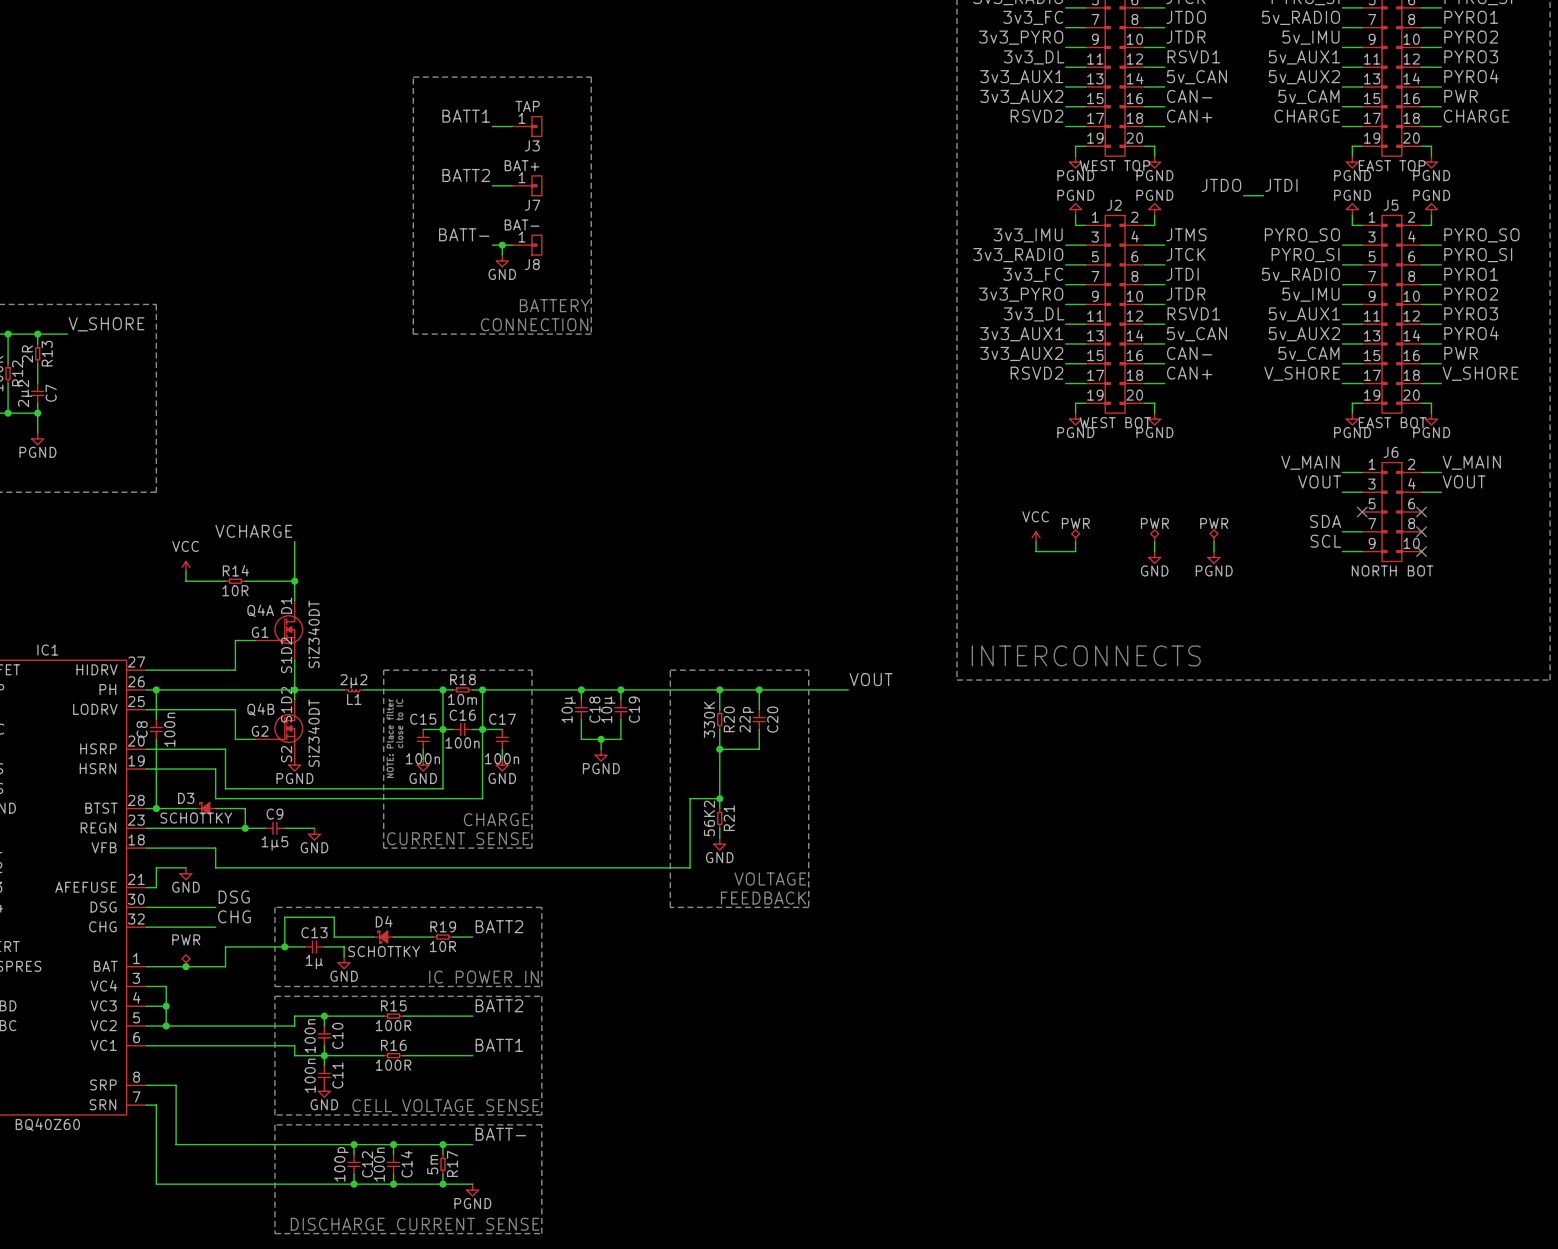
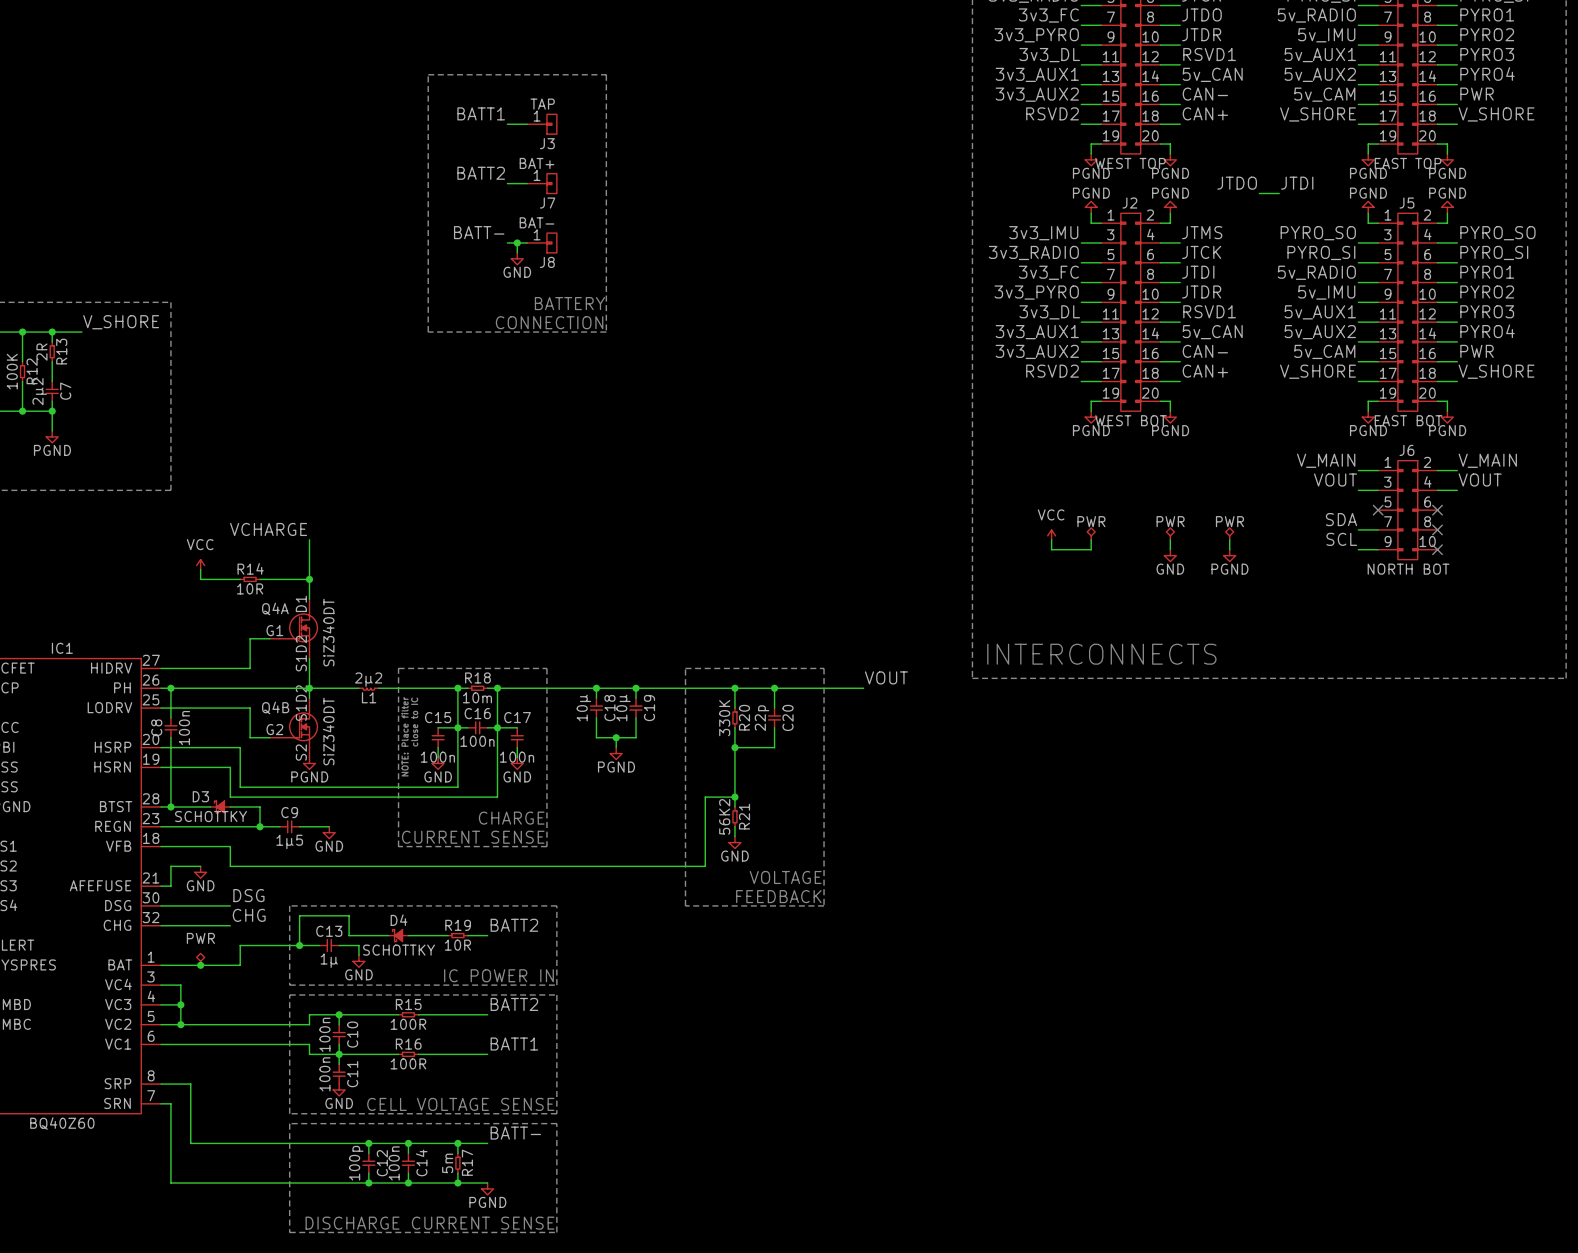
label: CHARGE (1307, 116) -> V_SHORE (1317, 114)
label: CHARGE (1476, 116) -> V_SHORE (1496, 114)

